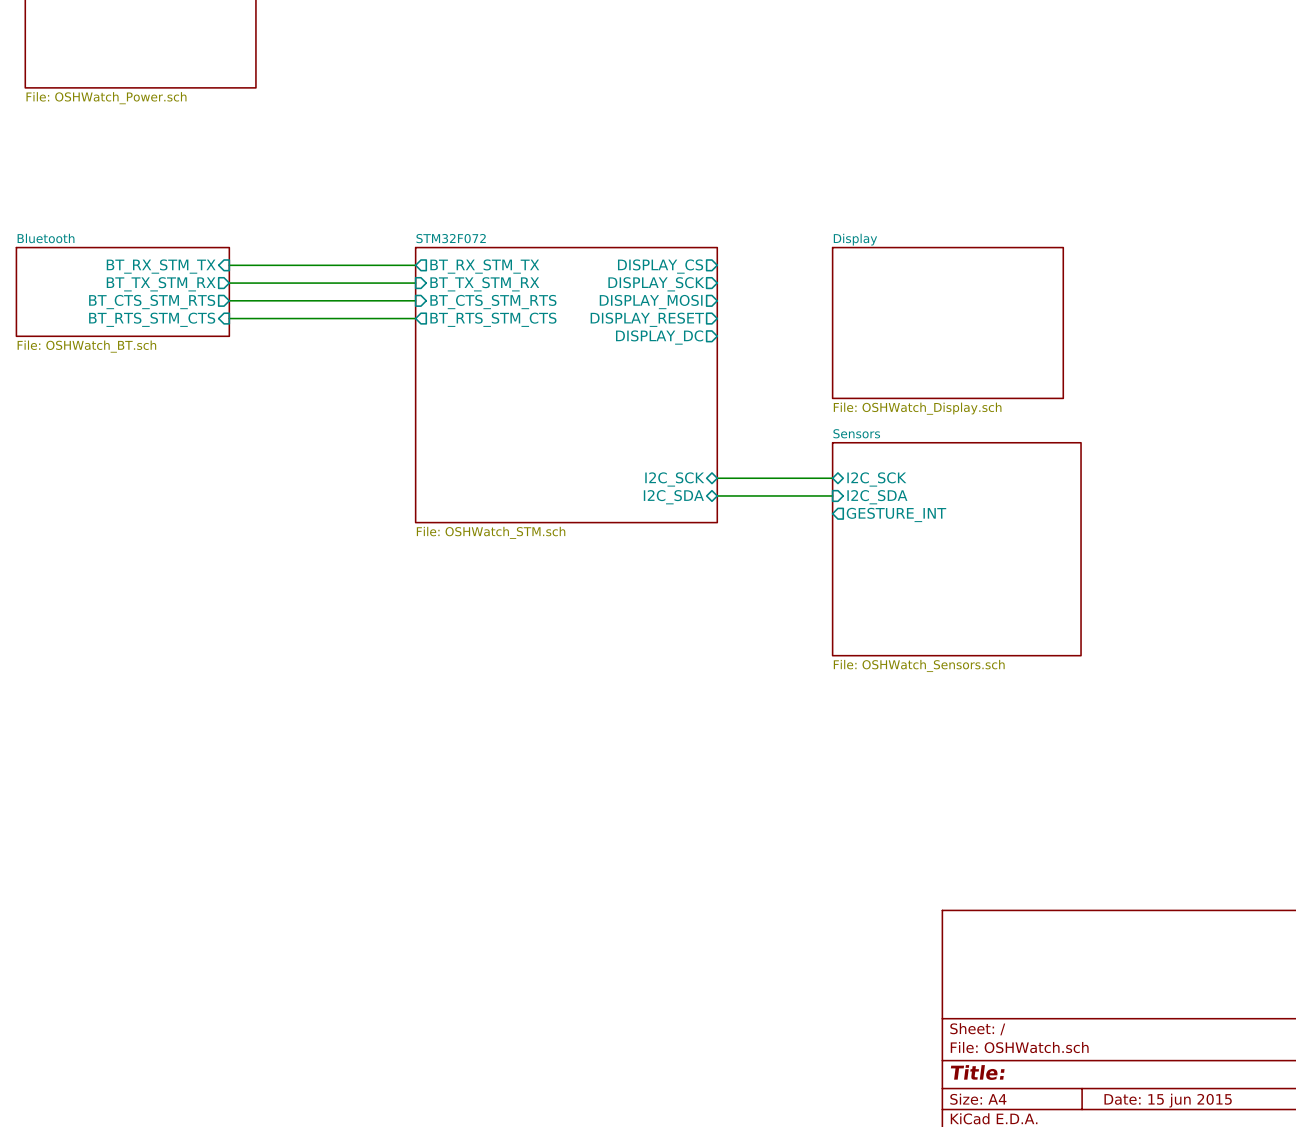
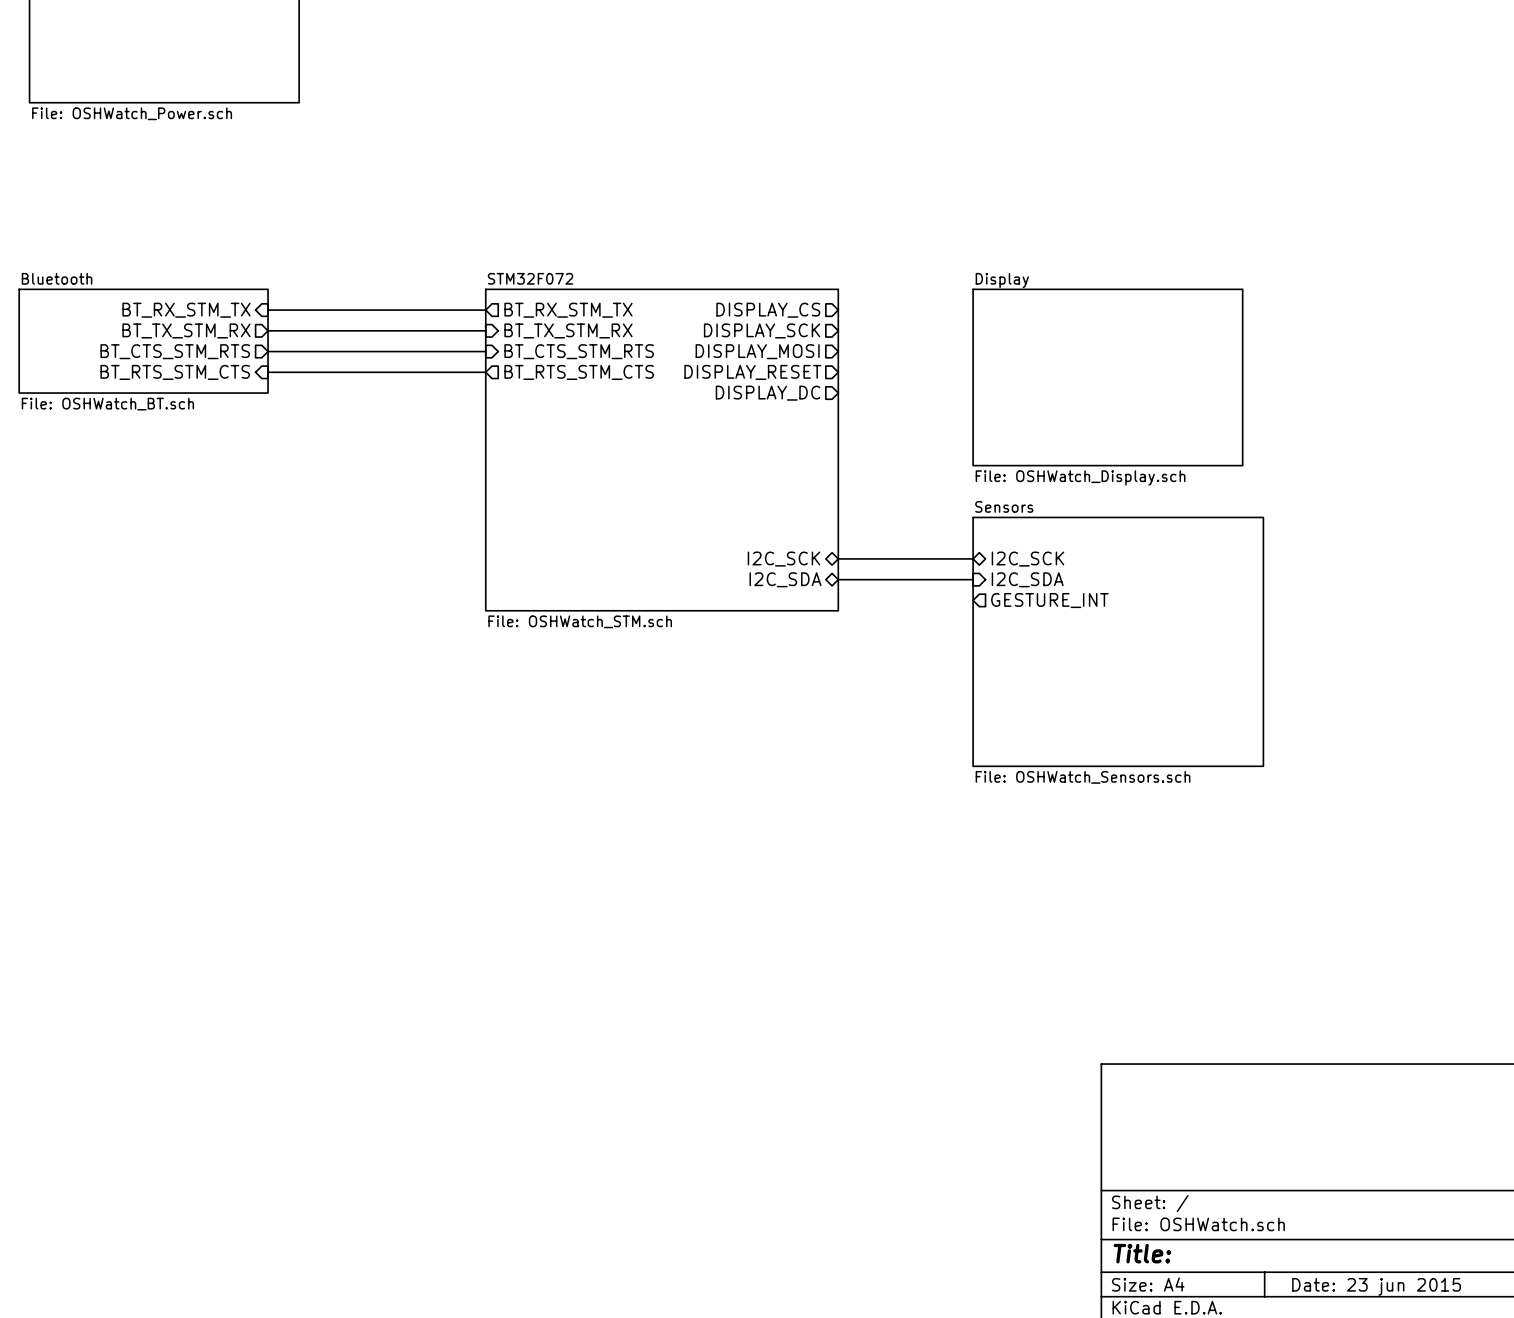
title block: Date: 15 jun 2015 (1168, 1100) -> Date: 23 jun 2015 (1376, 1286)

